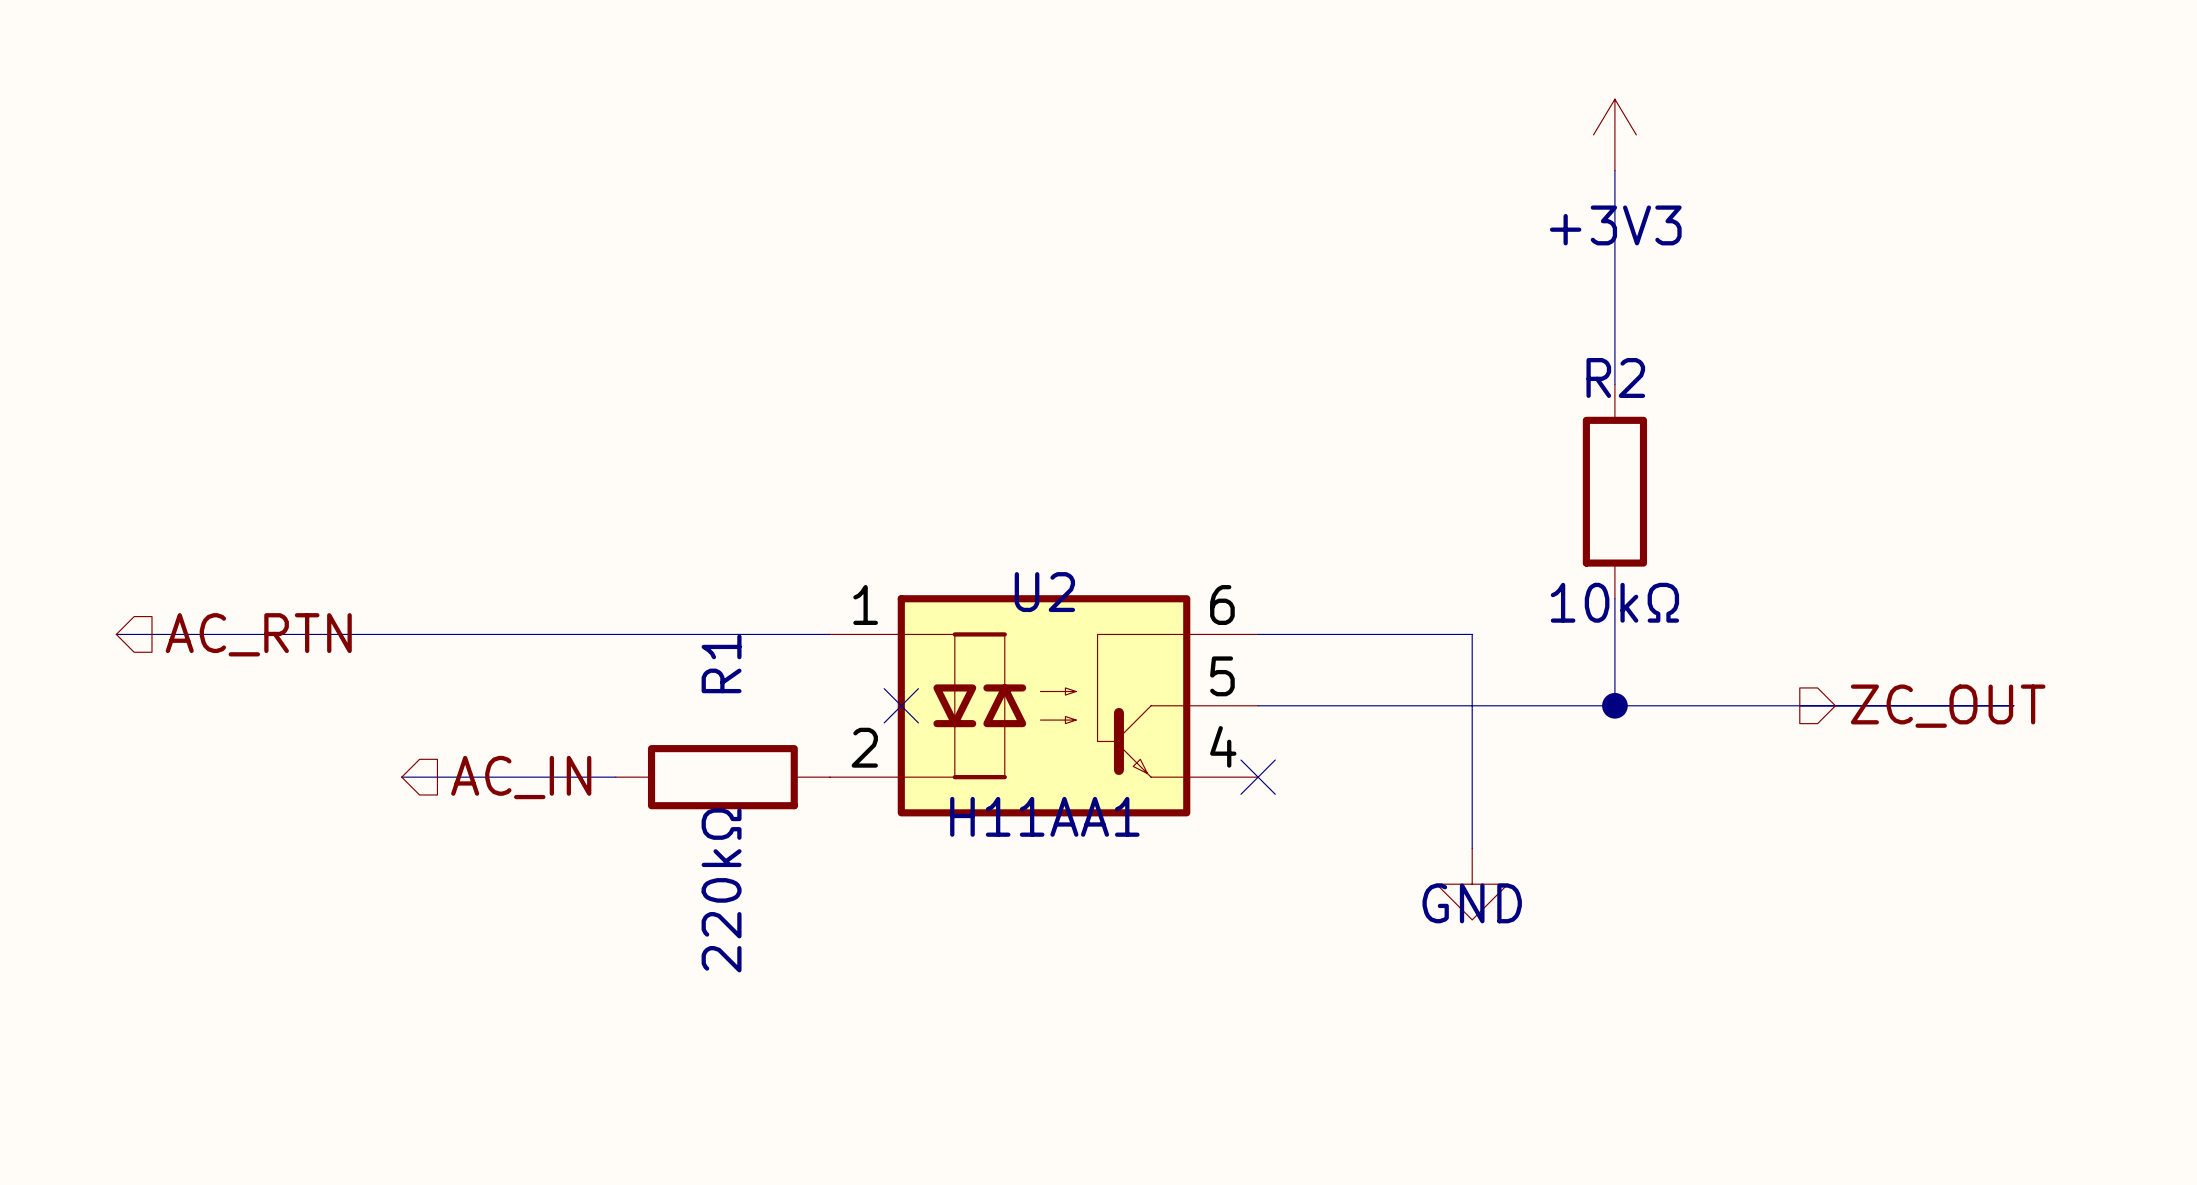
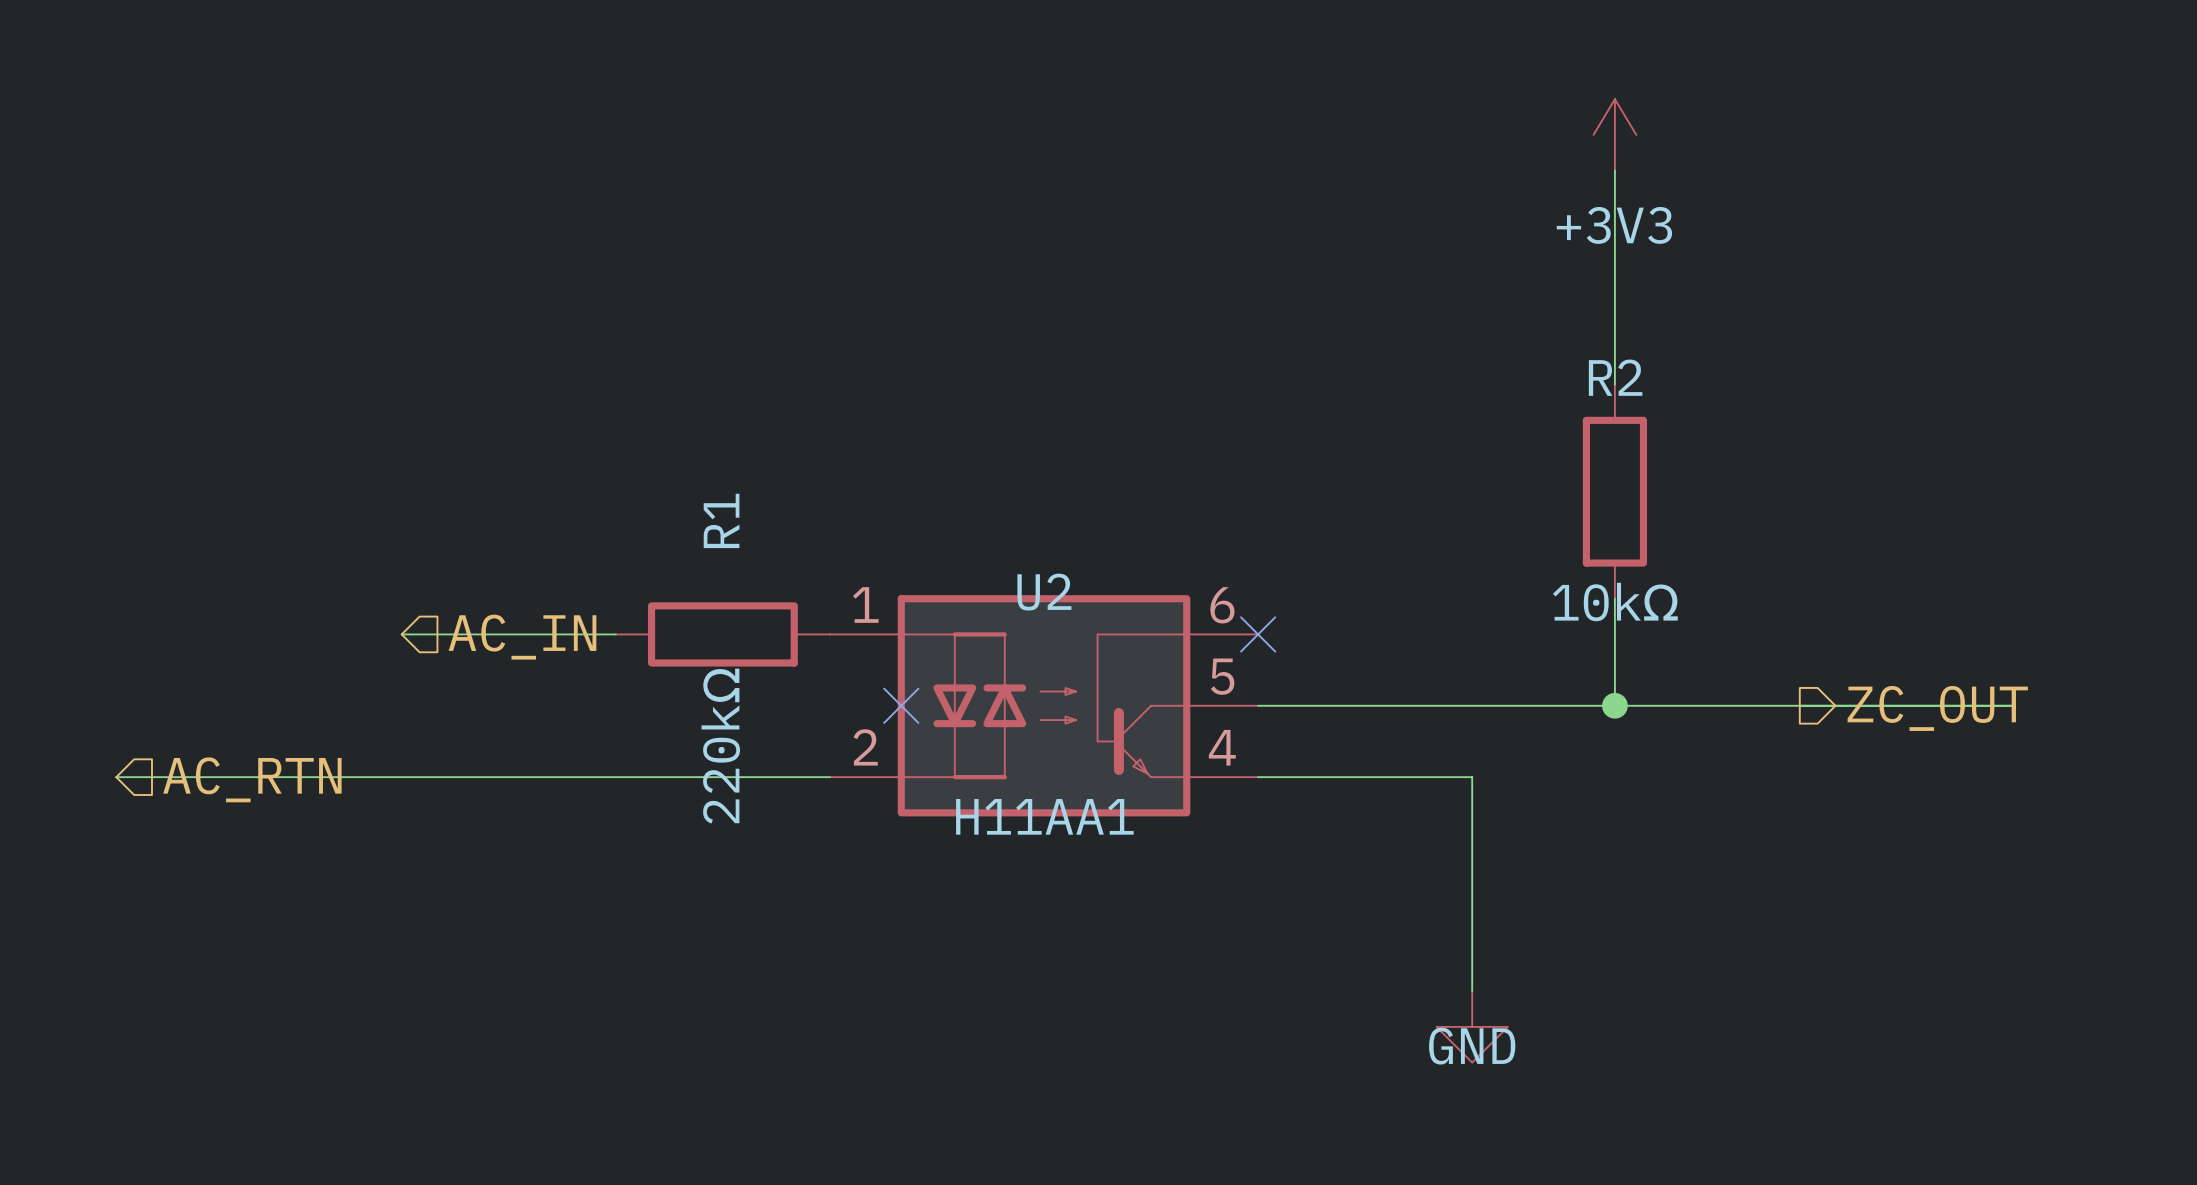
wire: (116, 634) (401, 634) -> (116, 777) (401, 777)
hierarchical label position: AC_RTN (258, 634) -> AC_RTN (252, 779)
wire: (615, 634) (829, 634) -> (615, 777) (829, 777)
wire: (1258, 634) (1472, 634) (1472, 777) -> (1258, 777) (1472, 777)
hierarchical label position: AC_IN (521, 777) -> AC_IN (522, 637)
R1 position: (722, 777) -> (722, 634)
no-connect mark position: (1258, 777) -> (1258, 634)
wire: none -> (1472, 848) (1472, 991)
power symbol position: GND (1472, 884) -> GND (1472, 1026)

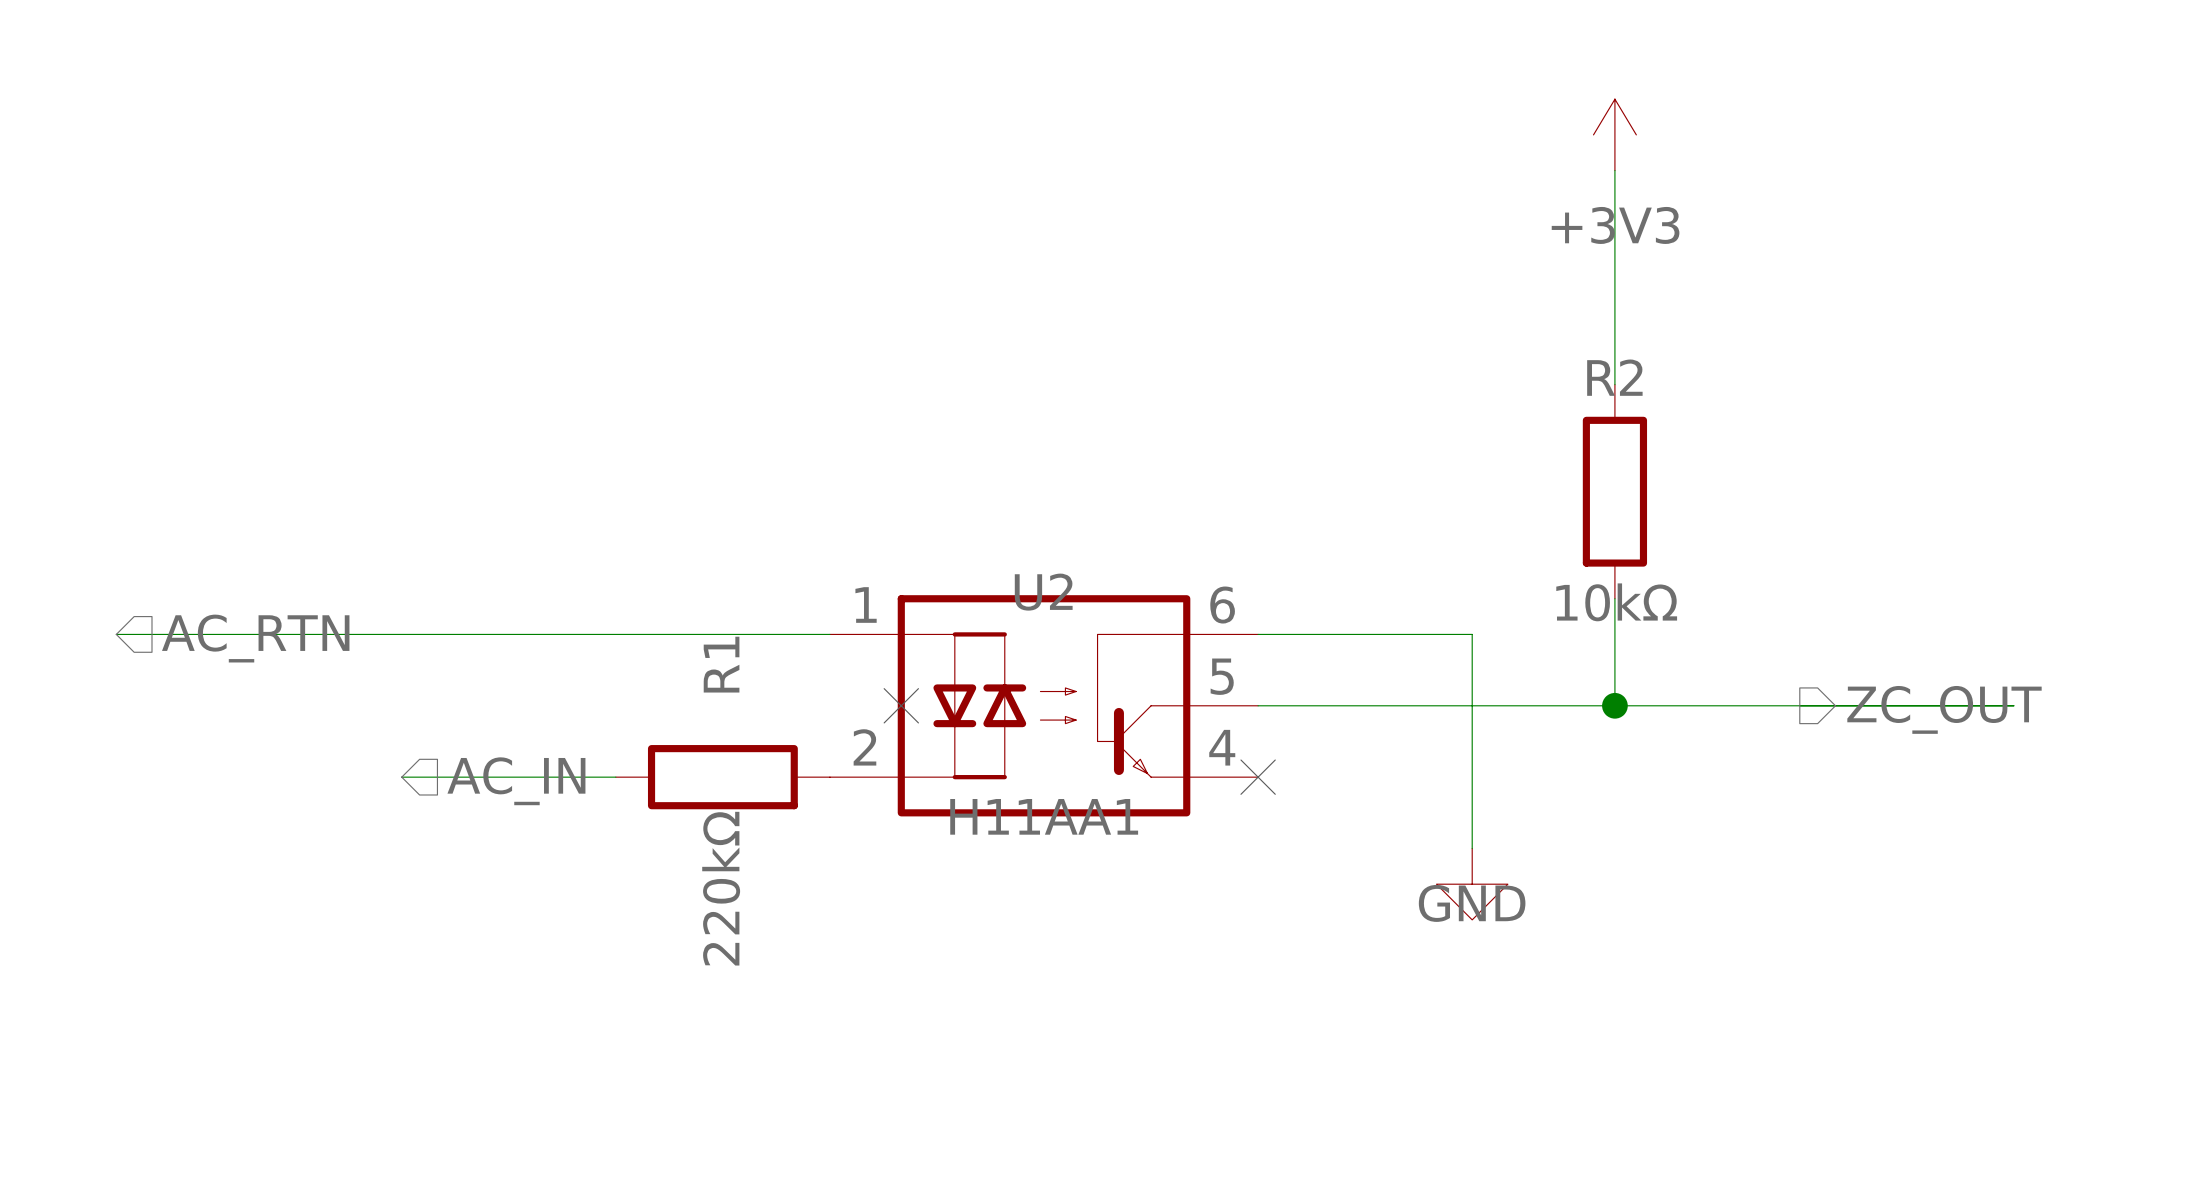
R1 position: (722, 634) -> (722, 777)
no-connect mark position: (1258, 634) -> (1258, 777)
hierarchical label position: AC_IN (522, 637) -> AC_IN (516, 781)
wire: (116, 777) (401, 777) -> (116, 634) (401, 634)
wire: (615, 777) (829, 777) -> (615, 634) (829, 634)
wire: (1258, 777) (1472, 777) -> (1258, 634) (1472, 634) (1472, 777)
hierarchical label position: AC_RTN (252, 779) -> AC_RTN (255, 638)
wire: (1472, 848) (1472, 991) -> none
power symbol position: GND (1472, 1026) -> GND (1472, 884)

